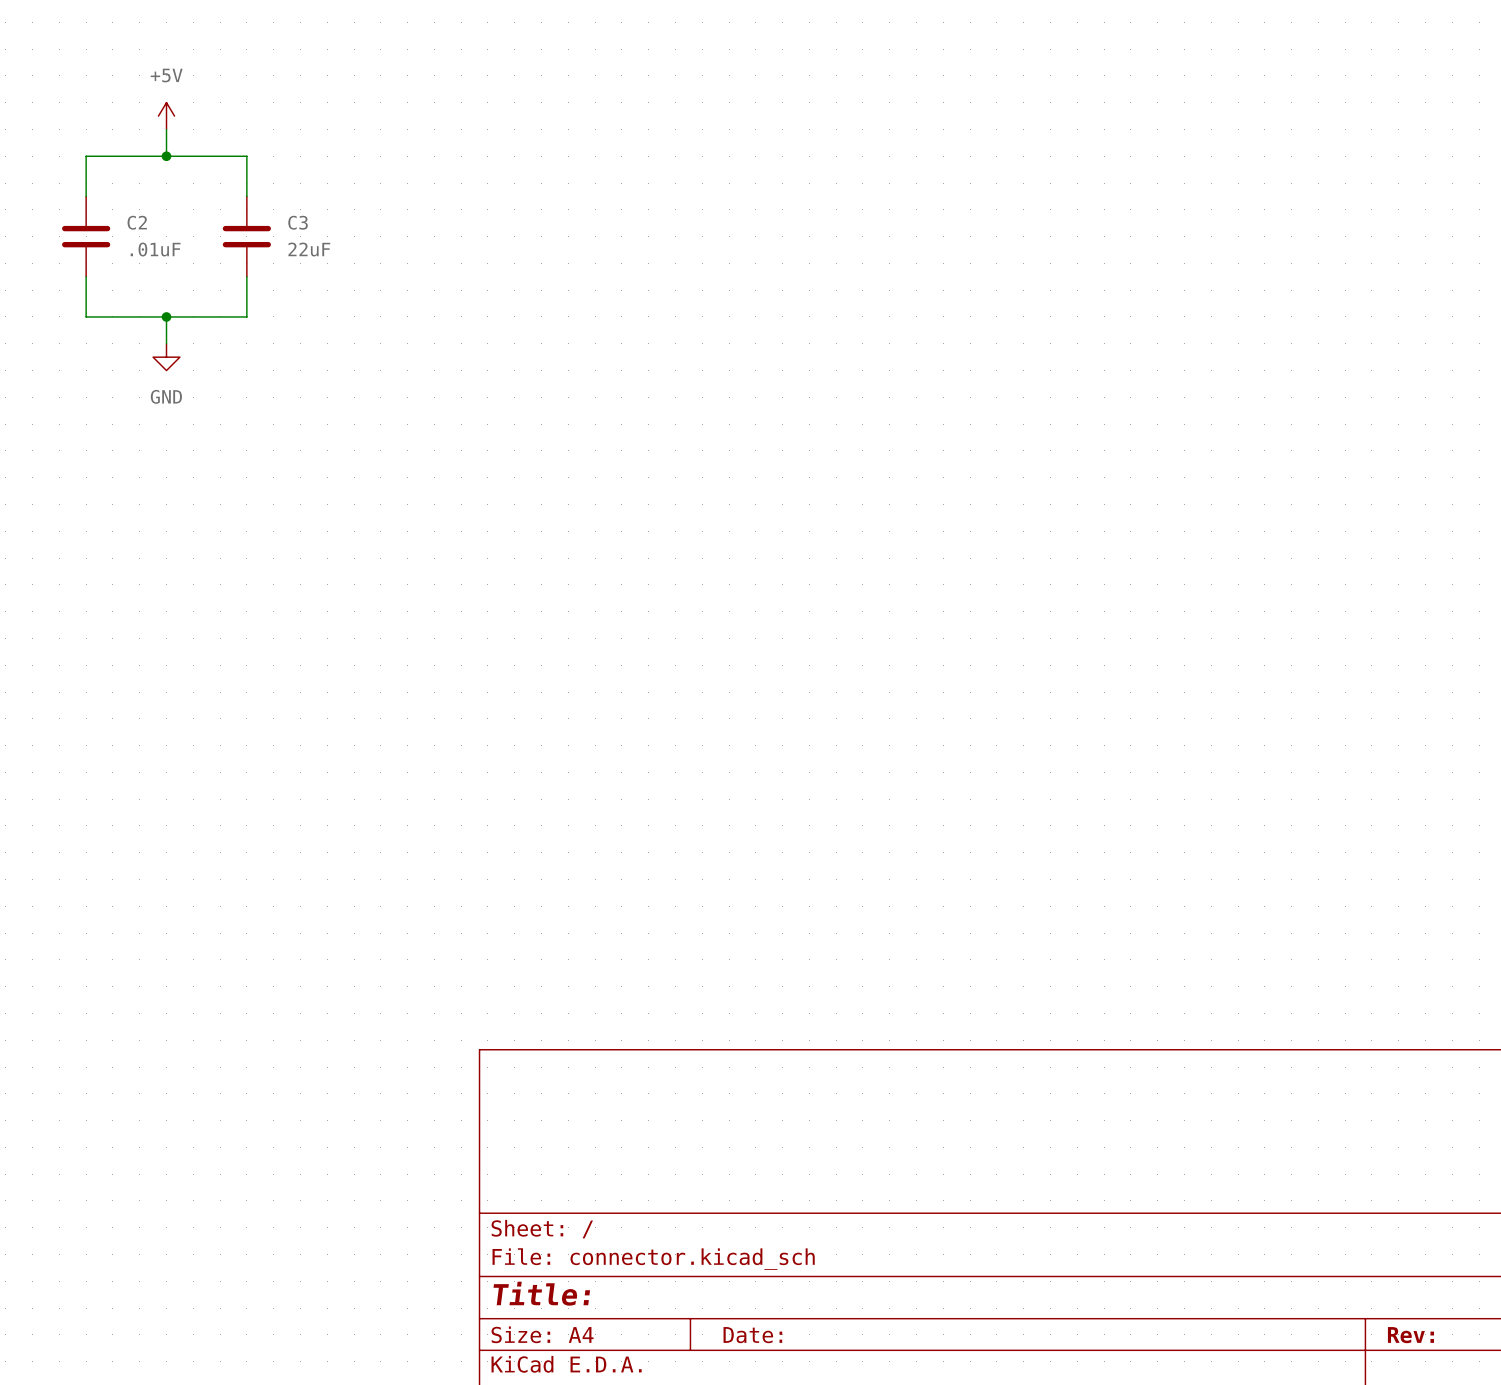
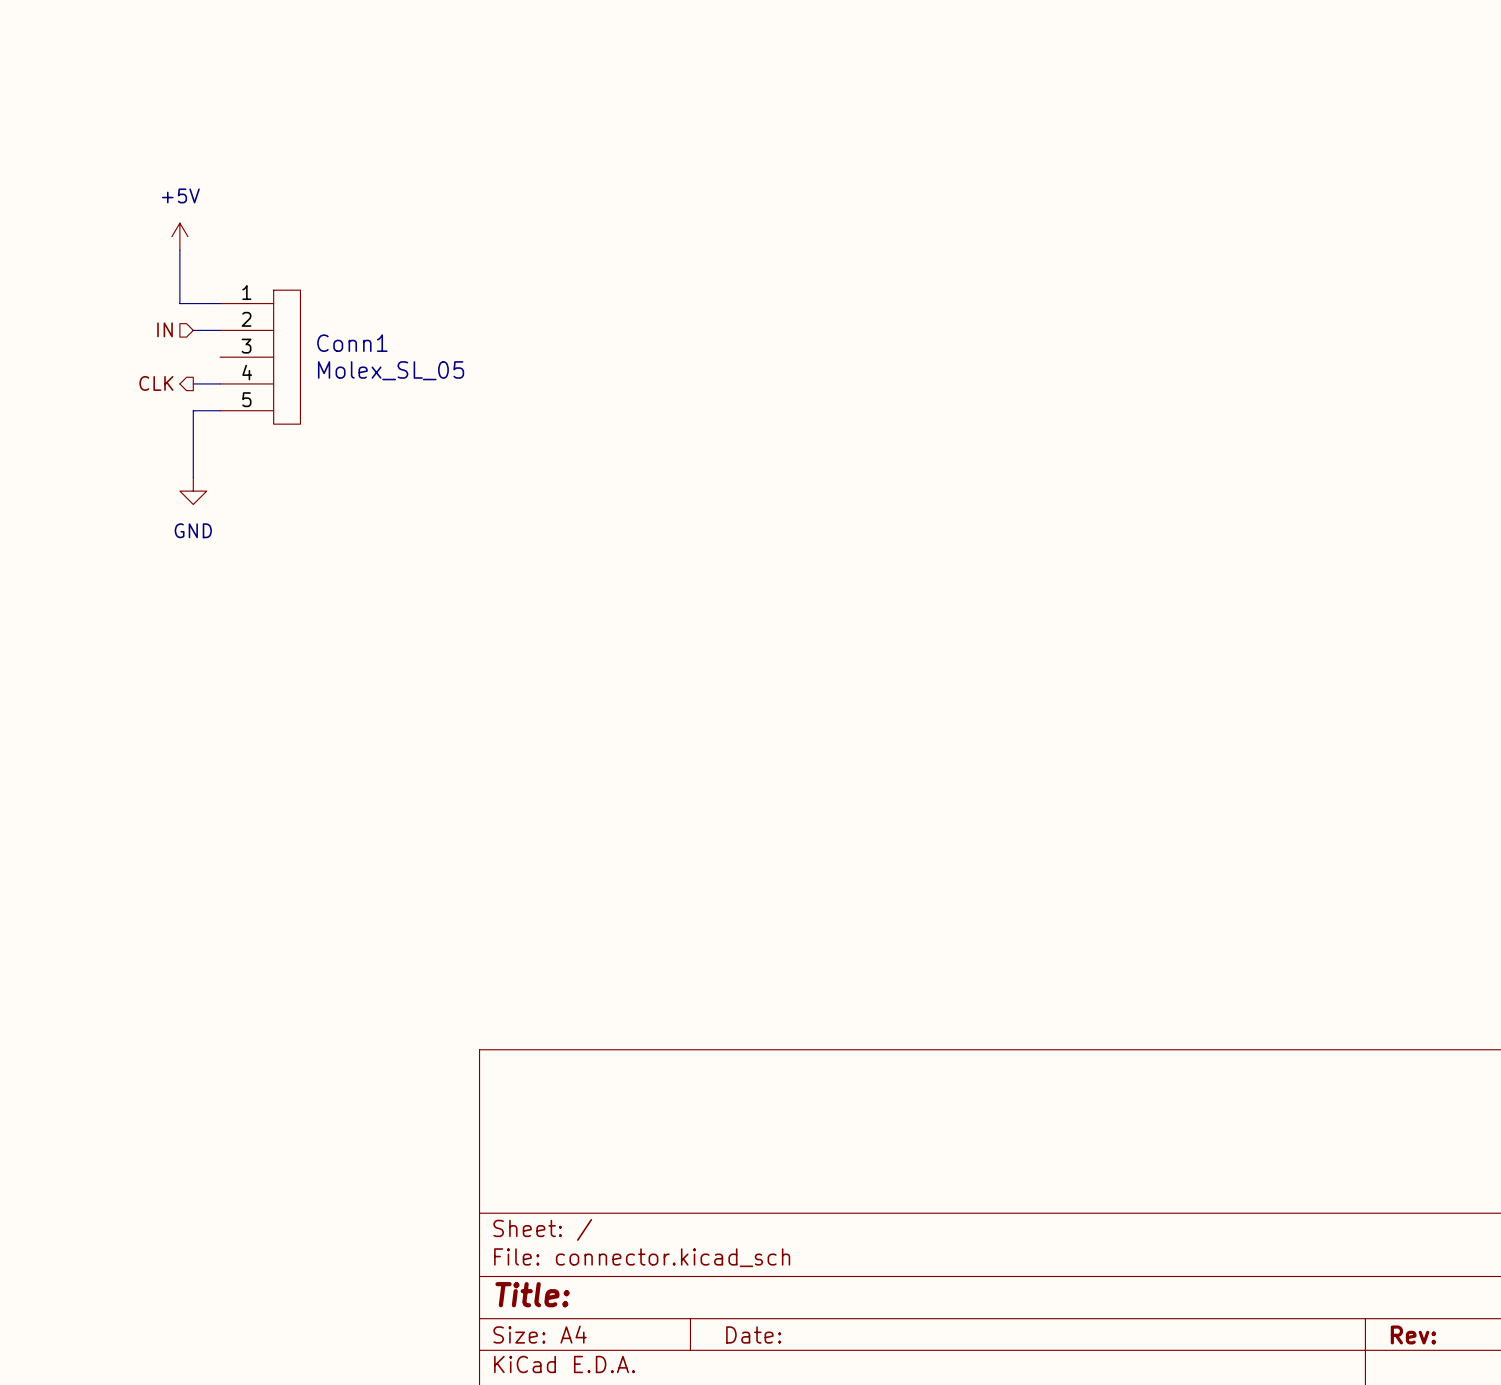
power symbol position: +5V (166, 116) -> +5V (179, 236)
wire: (166, 129) (166, 156) -> none
junction: (166, 156) -> none
wire: (86, 196) (86, 156) (246, 156) (246, 196) -> none
C2: .01uF (86, 236) -> none
C3: 22uF (246, 236) -> none
wire: none -> (179, 250) (179, 303) (220, 303)
wire: (86, 276) (86, 316) (246, 316) (246, 276) -> none
wire: (166, 316) (166, 343) -> none
junction: (166, 316) -> none
hierarchical label: none -> IN (165, 329)
wire: none -> (193, 330) (220, 330)
power symbol position: GND (166, 357) -> GND (193, 491)
Conn1: none -> Molex_SL_05 (260, 357)
hierarchical label: none -> CLK (156, 383)
wire: none -> (193, 383) (220, 383)
wire: none -> (220, 410) (193, 410) (193, 477)

